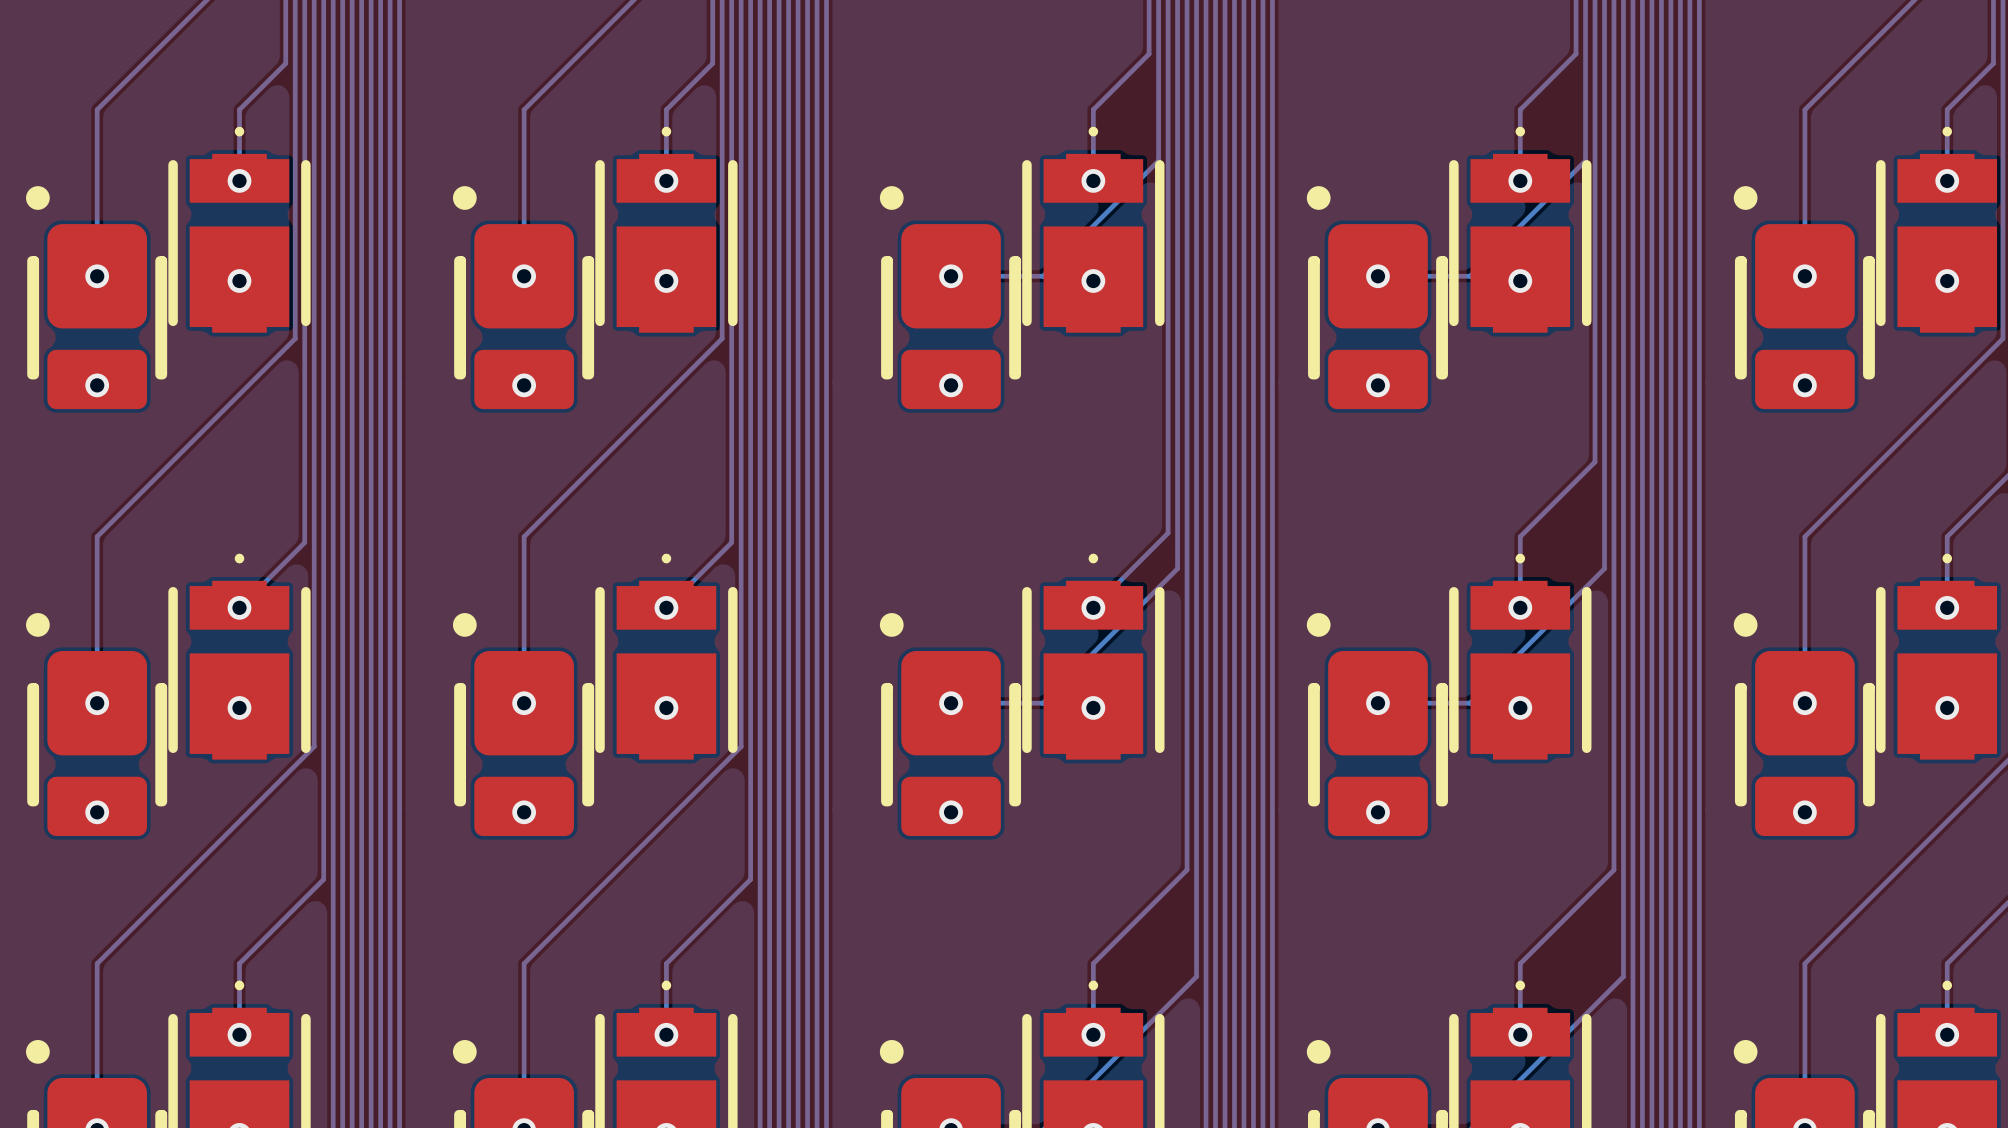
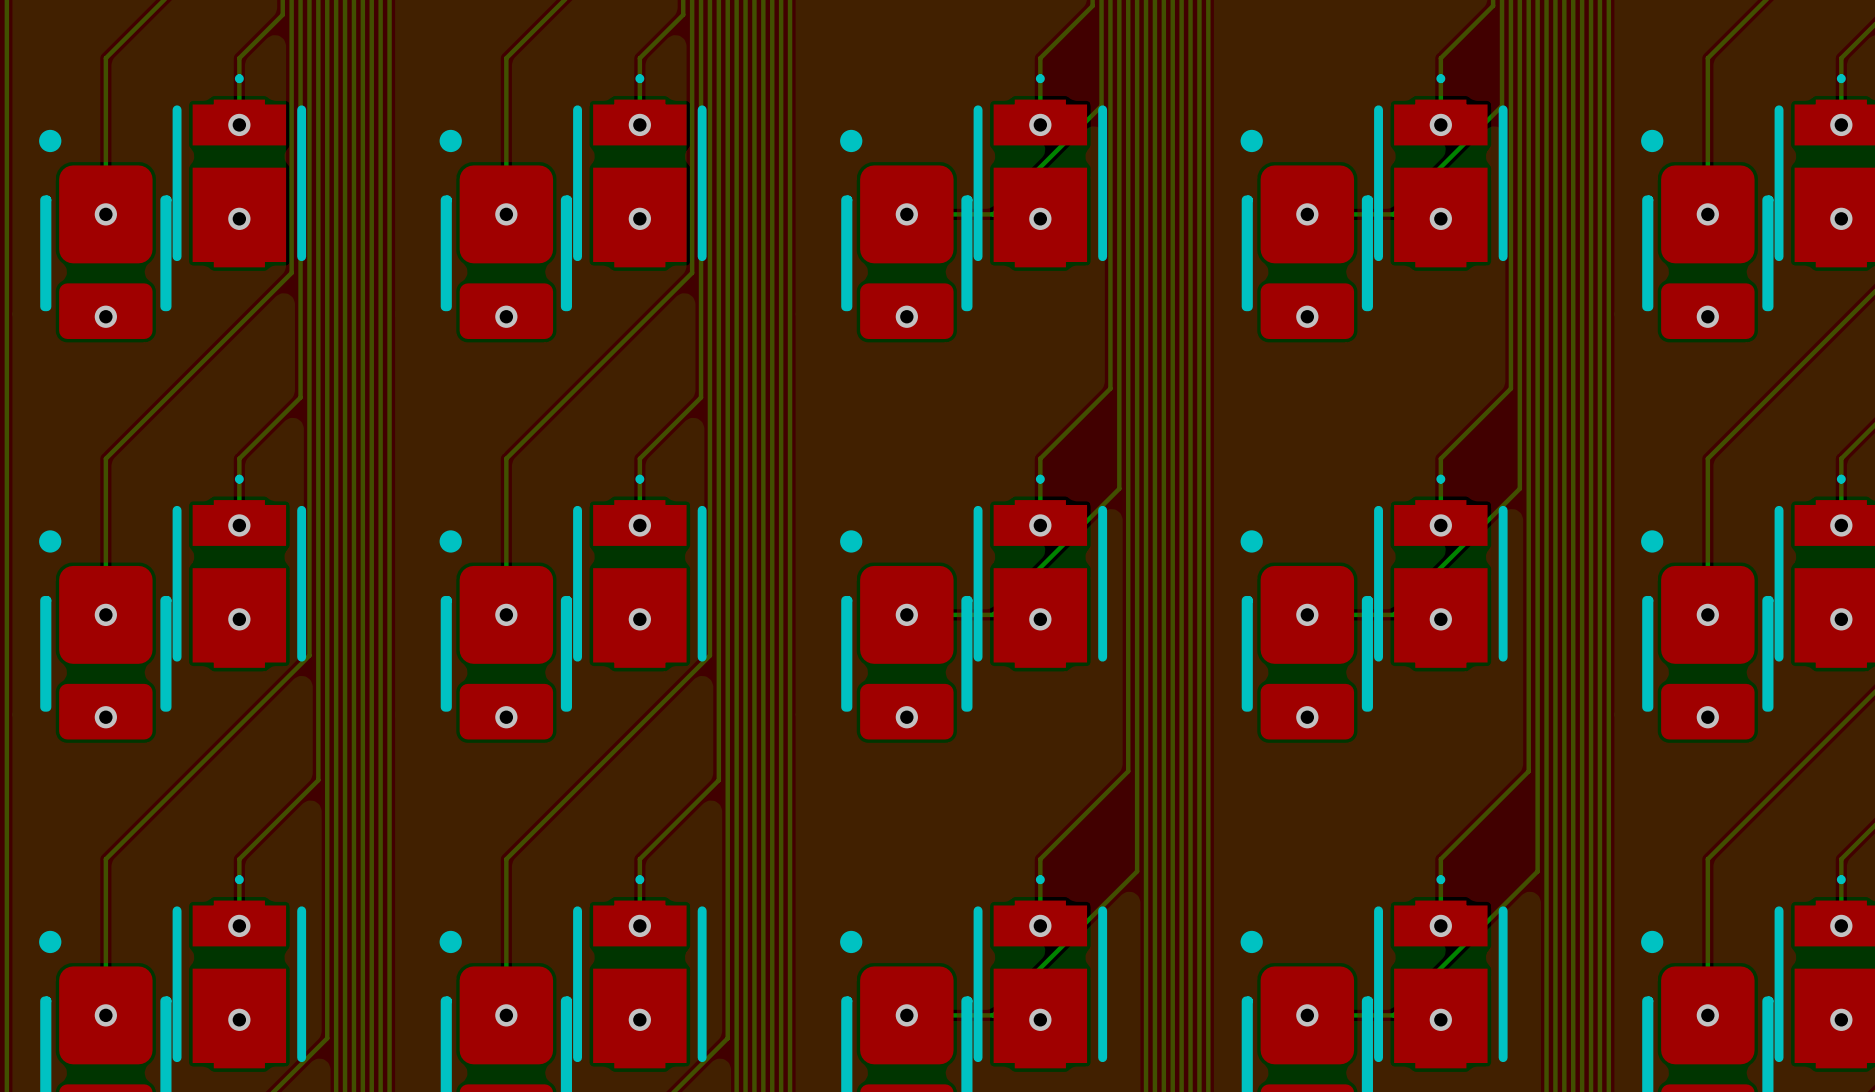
bottom track: (1168, 461) (1168, 533) (1093, 607) -> (1110, 388) (1040, 458) (1040, 525)
bottom track: (304, 471) (304, 542) (239, 607) -> (300, 397) (239, 458) (239, 525)
bottom track: (731, 471) (731, 542) (666, 607) -> (701, 397) (639, 458) (639, 525)

